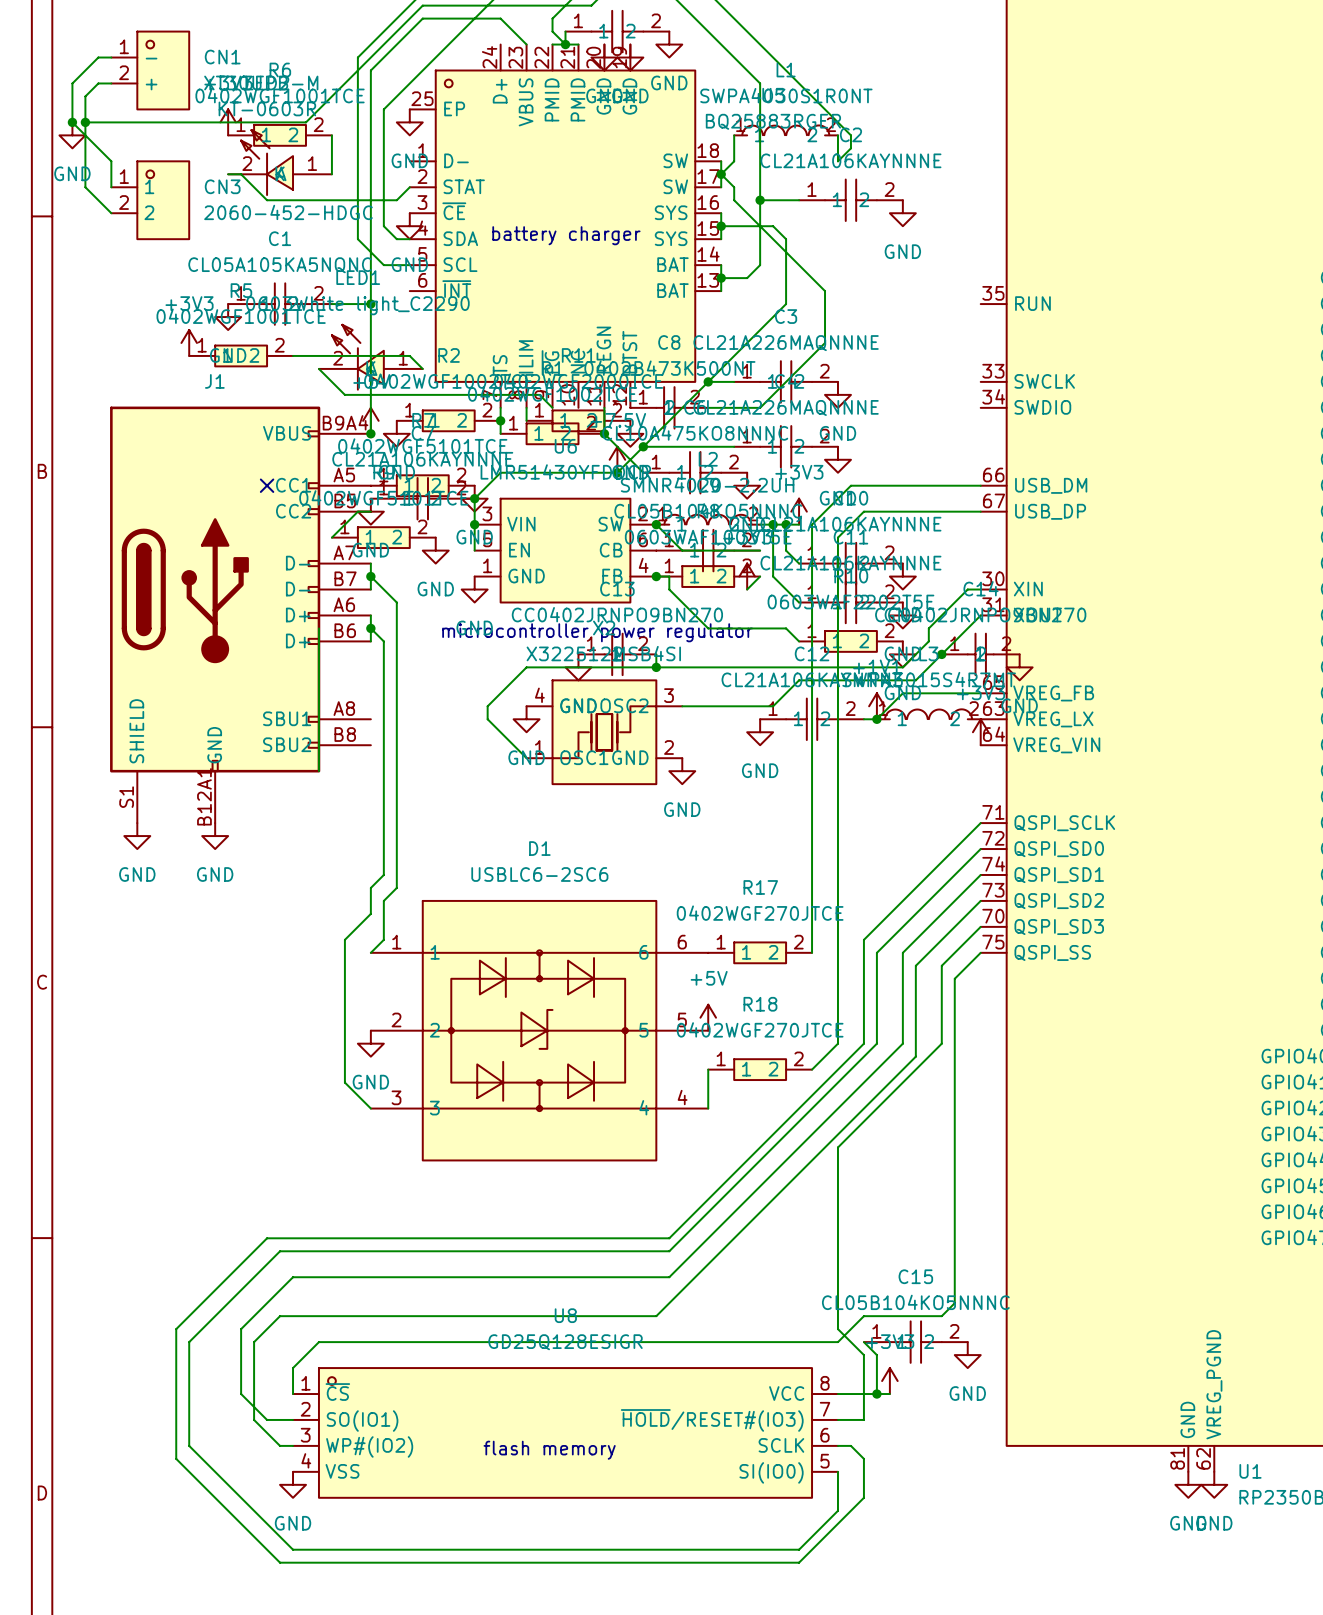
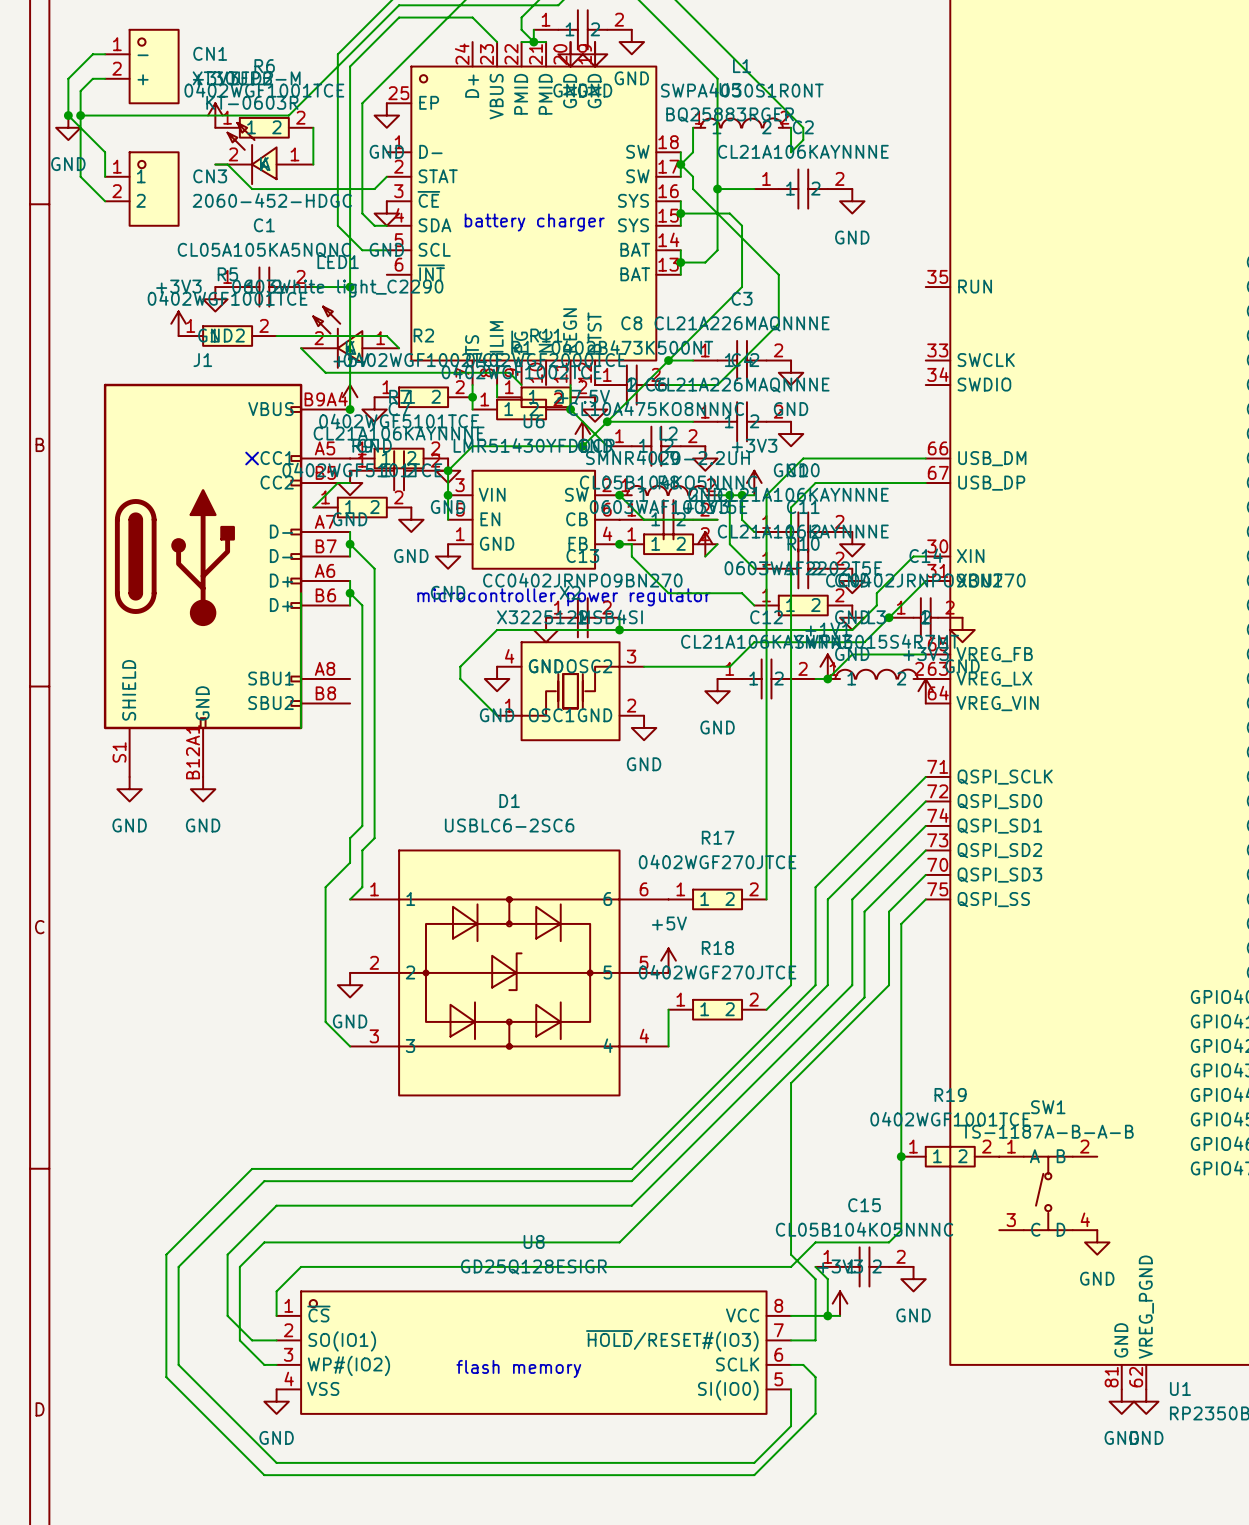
junction: none -> (901, 1156)
R19: none -> 0402WGF1001TCE (950, 1156)
SW1: none -> TS-1187A-B-A-B (1048, 1193)
power symbol: none -> GND (1097, 1242)

